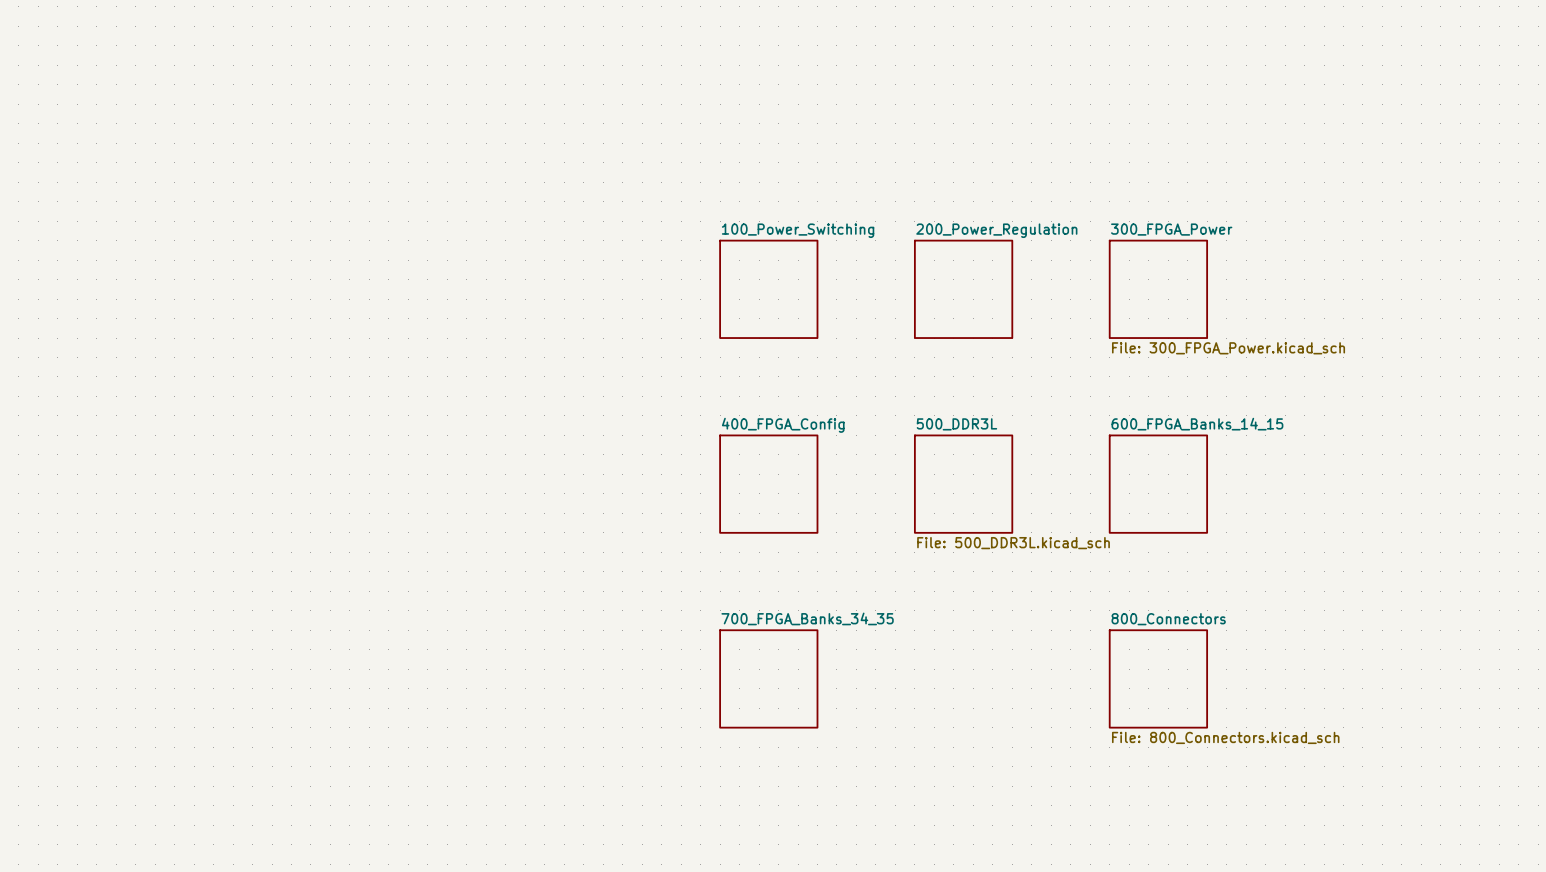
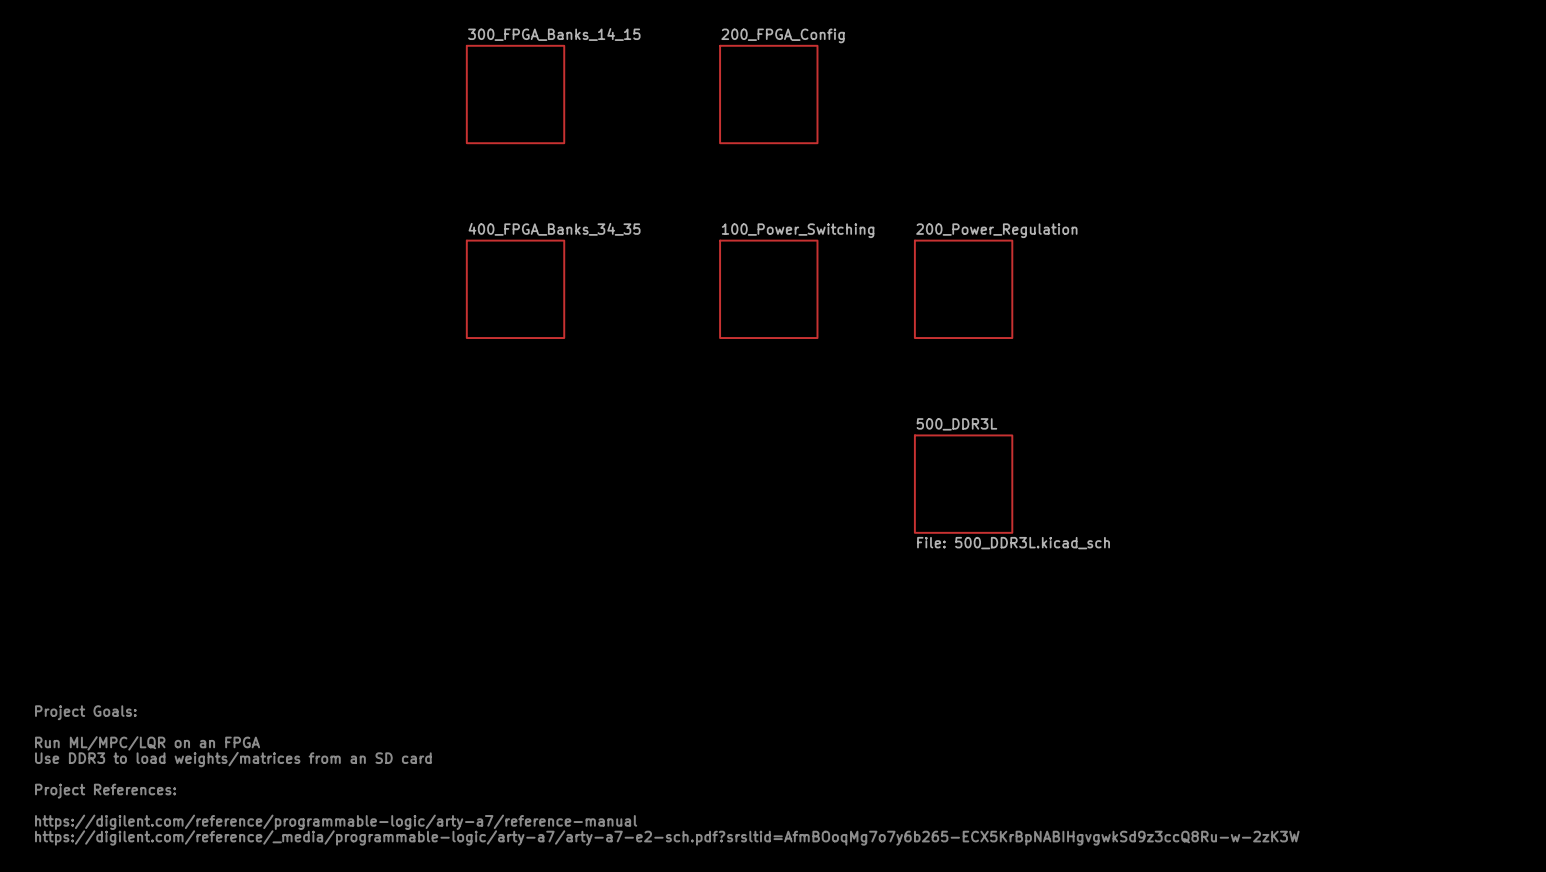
sheet 300_FPGA_Banks_14_15: none -> (515, 94)
sheet 200_FPGA_Config: none -> (768, 94)
sheet 400_FPGA_Banks_34_35: none -> (515, 289)
sheet 300_FPGA_Power: File: 300_FPGA_Power.kicad_sch (1158, 289) -> none
sheet 400_FPGA_Config: (768, 484) -> none
sheet 600_FPGA_Banks_14_15: (1158, 484) -> none
sheet 700_FPGA_Banks_34_35: (768, 678) -> none
sheet 800_Connectors: File: 800_Connectors.kicad_sch (1158, 678) -> none
text: none -> Project Goals: (85, 712)
text: none -> Run ML/MPC/LQR on an FPGA (147, 743)
text: none -> Use DDR3 to load weights/matrices from an SD card (233, 759)
text: none -> Project References: (105, 791)
text: none -> https://digilent.com/reference/programmable-logic/arty-a7/reference-manual (336, 822)
text: none -> https://digilent.com/reference/_media/programmable-logic/arty-a7/arty-a7-e2-sch.pdf?srsltid=AfmBOoqMg7o7y6b265-ECX5KrBpNABIHgvgwkSd9z3ccQ8Ru-w-2zK3W (667, 837)

